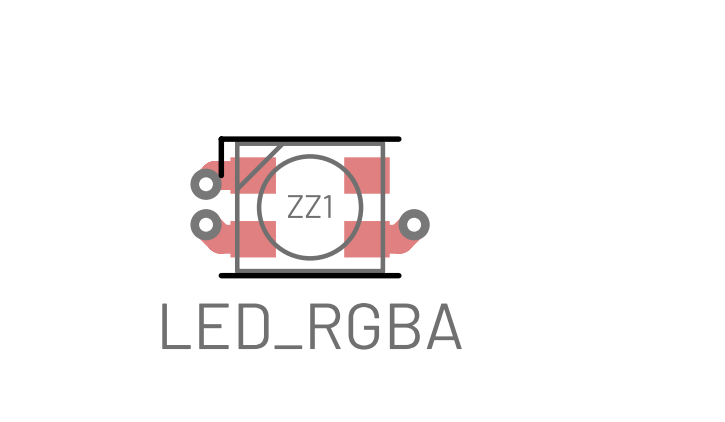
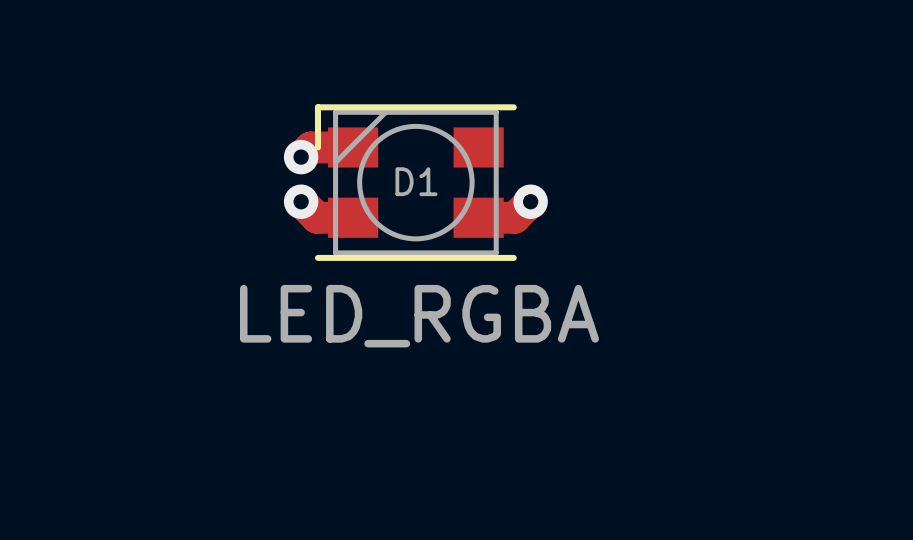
ZZ1 name: ZZ1 (309, 206) -> D1 (416, 181)

